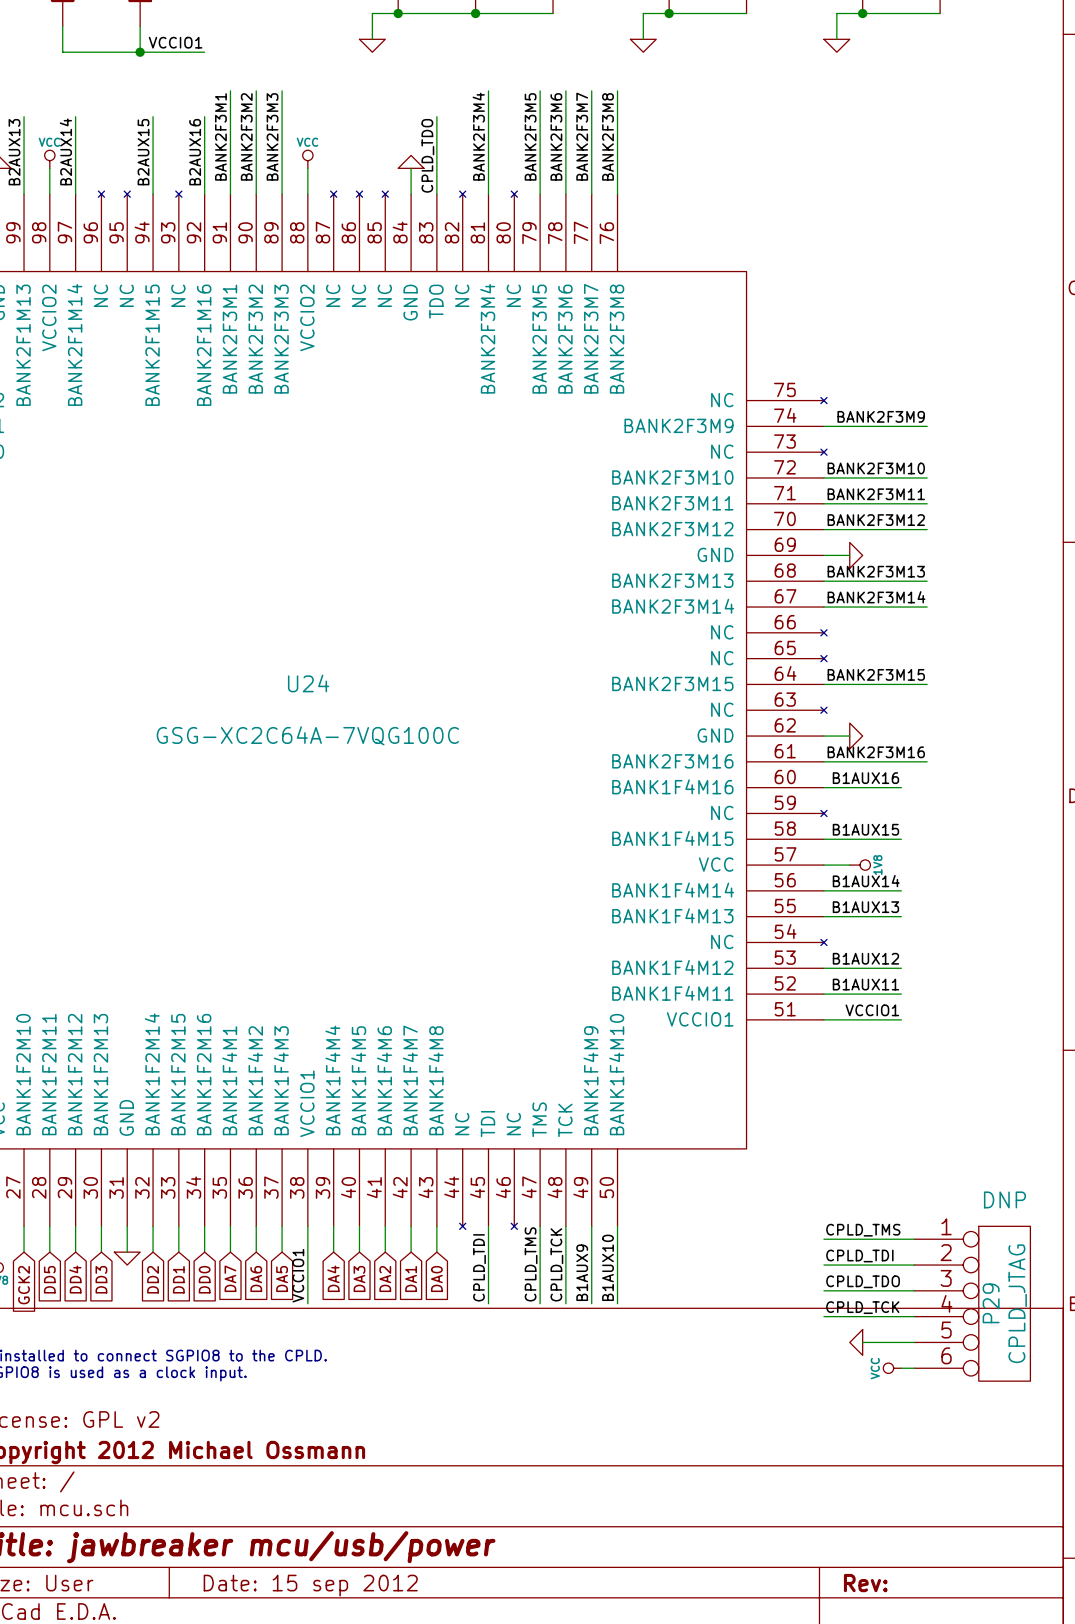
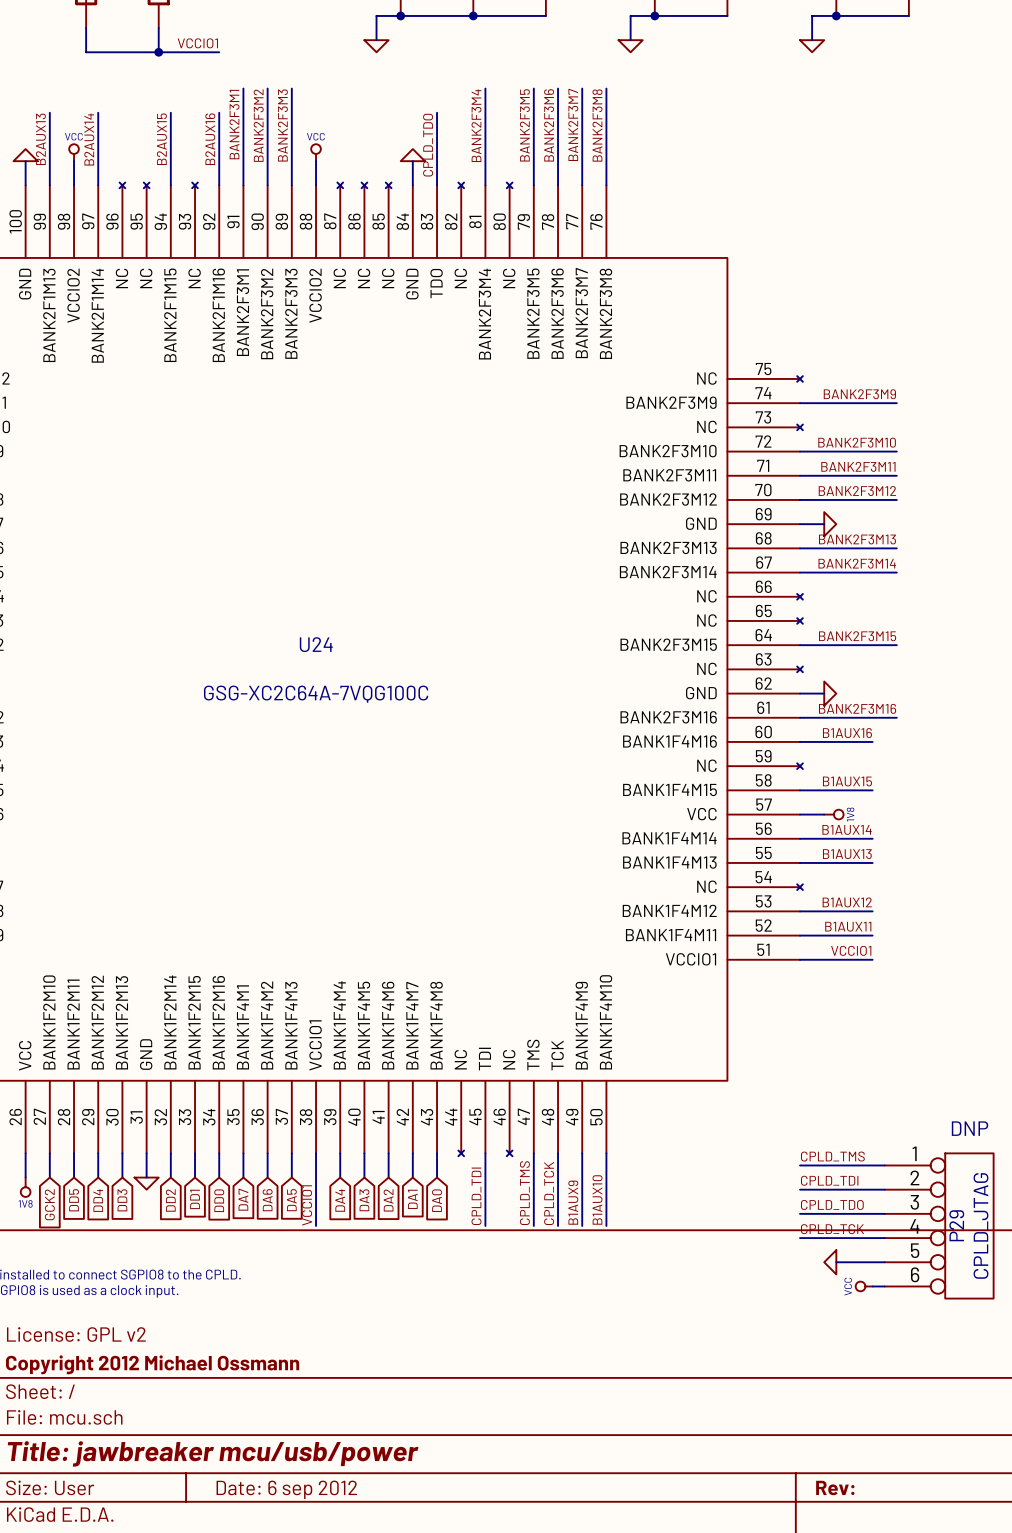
title block: Date: 15 sep 2012 (310, 1585) -> Date: 6 sep 2012 (286, 1489)

